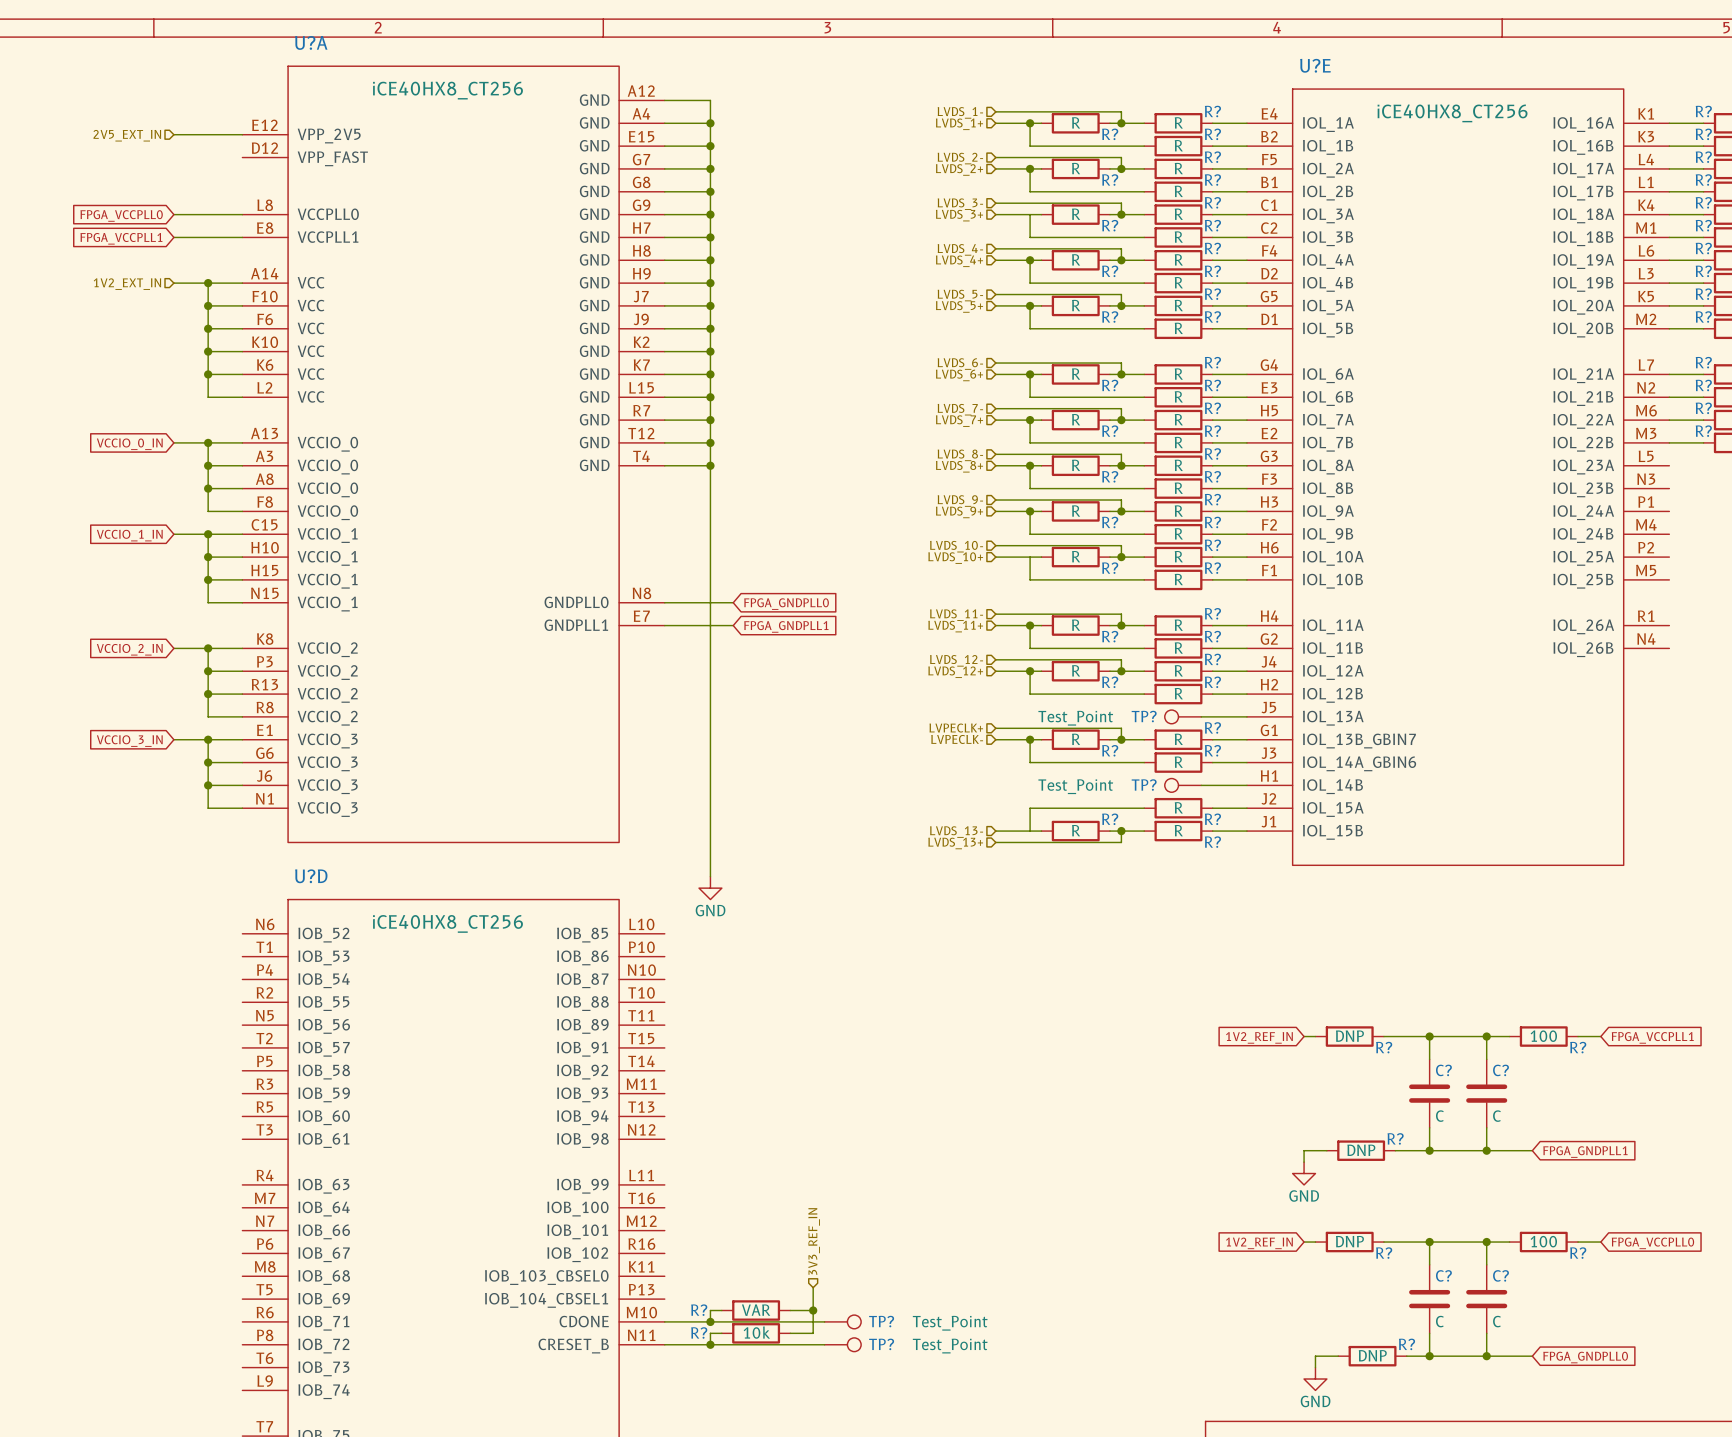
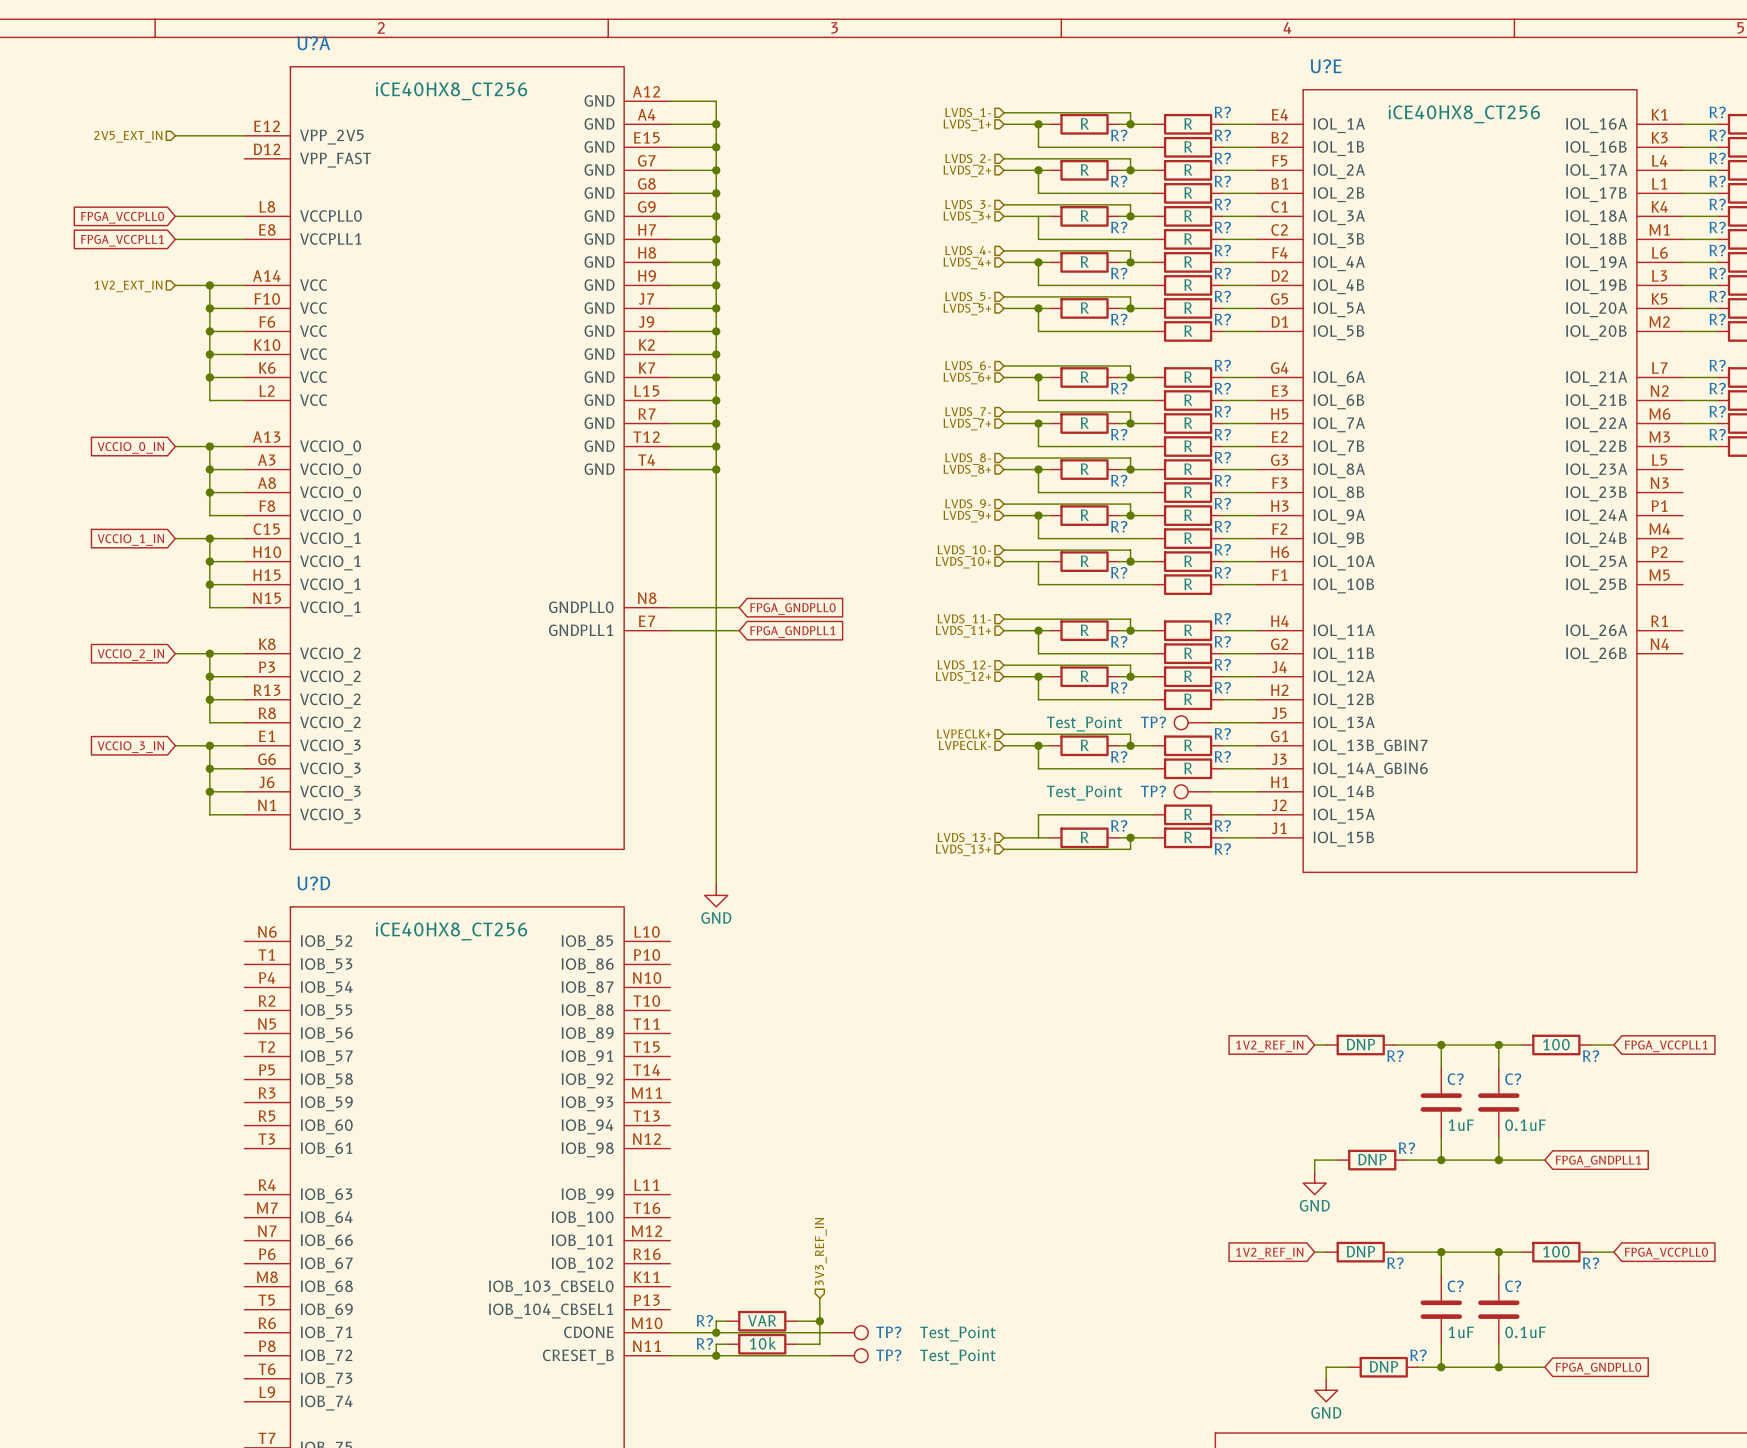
C? value: C (1439, 1116) -> 1uF (1461, 1125)
C? value: C (1496, 1116) -> 0.1uF (1525, 1125)
C? value: C (1439, 1321) -> 1uF (1461, 1332)
C? value: C (1496, 1321) -> 0.1uF (1525, 1332)

